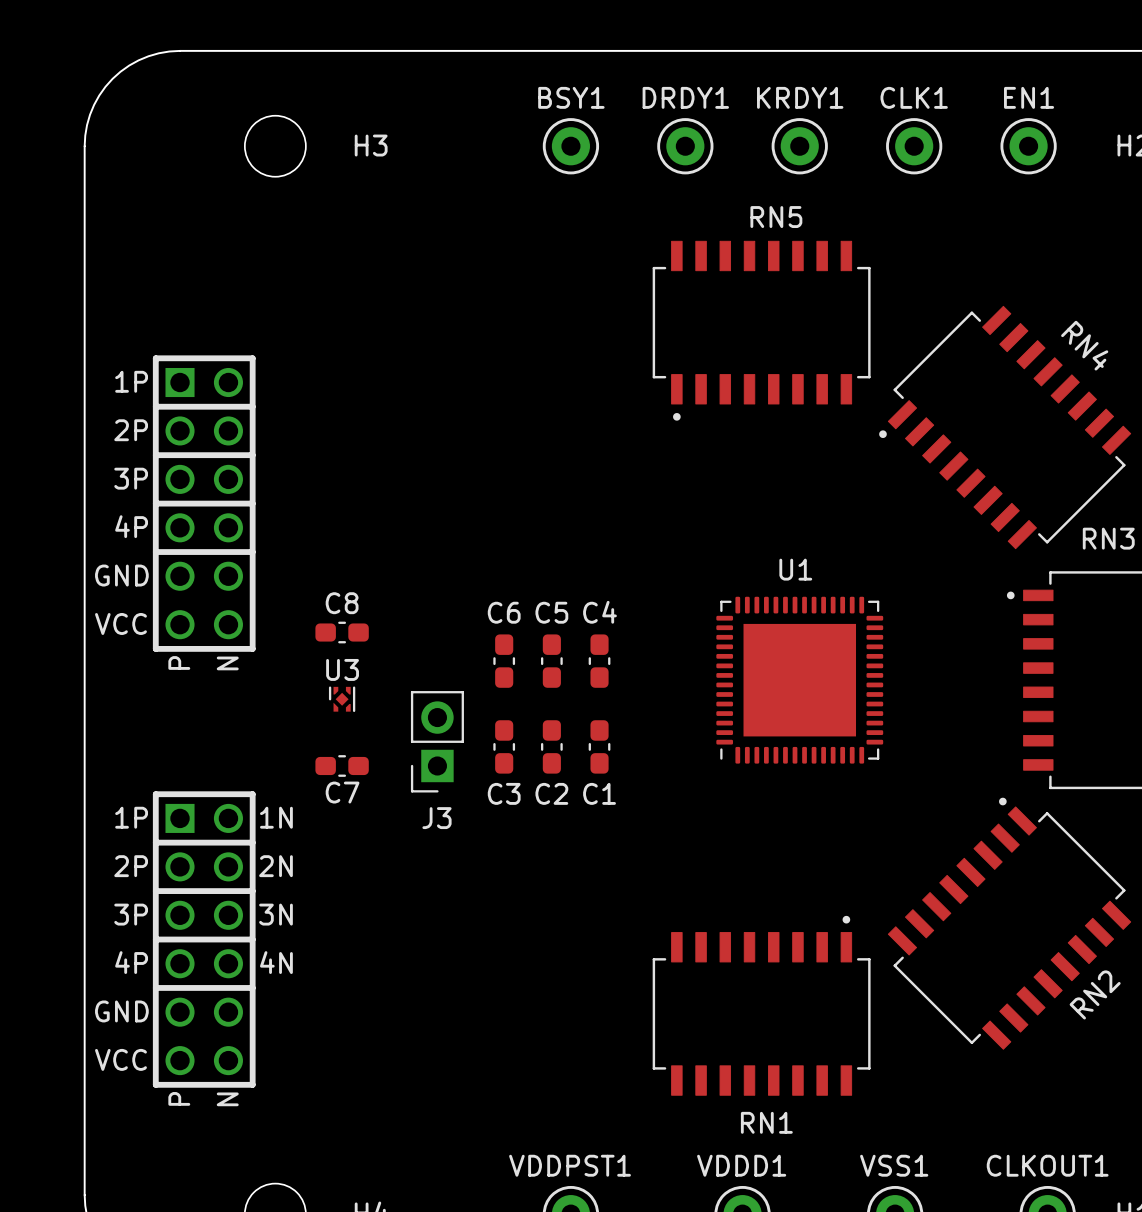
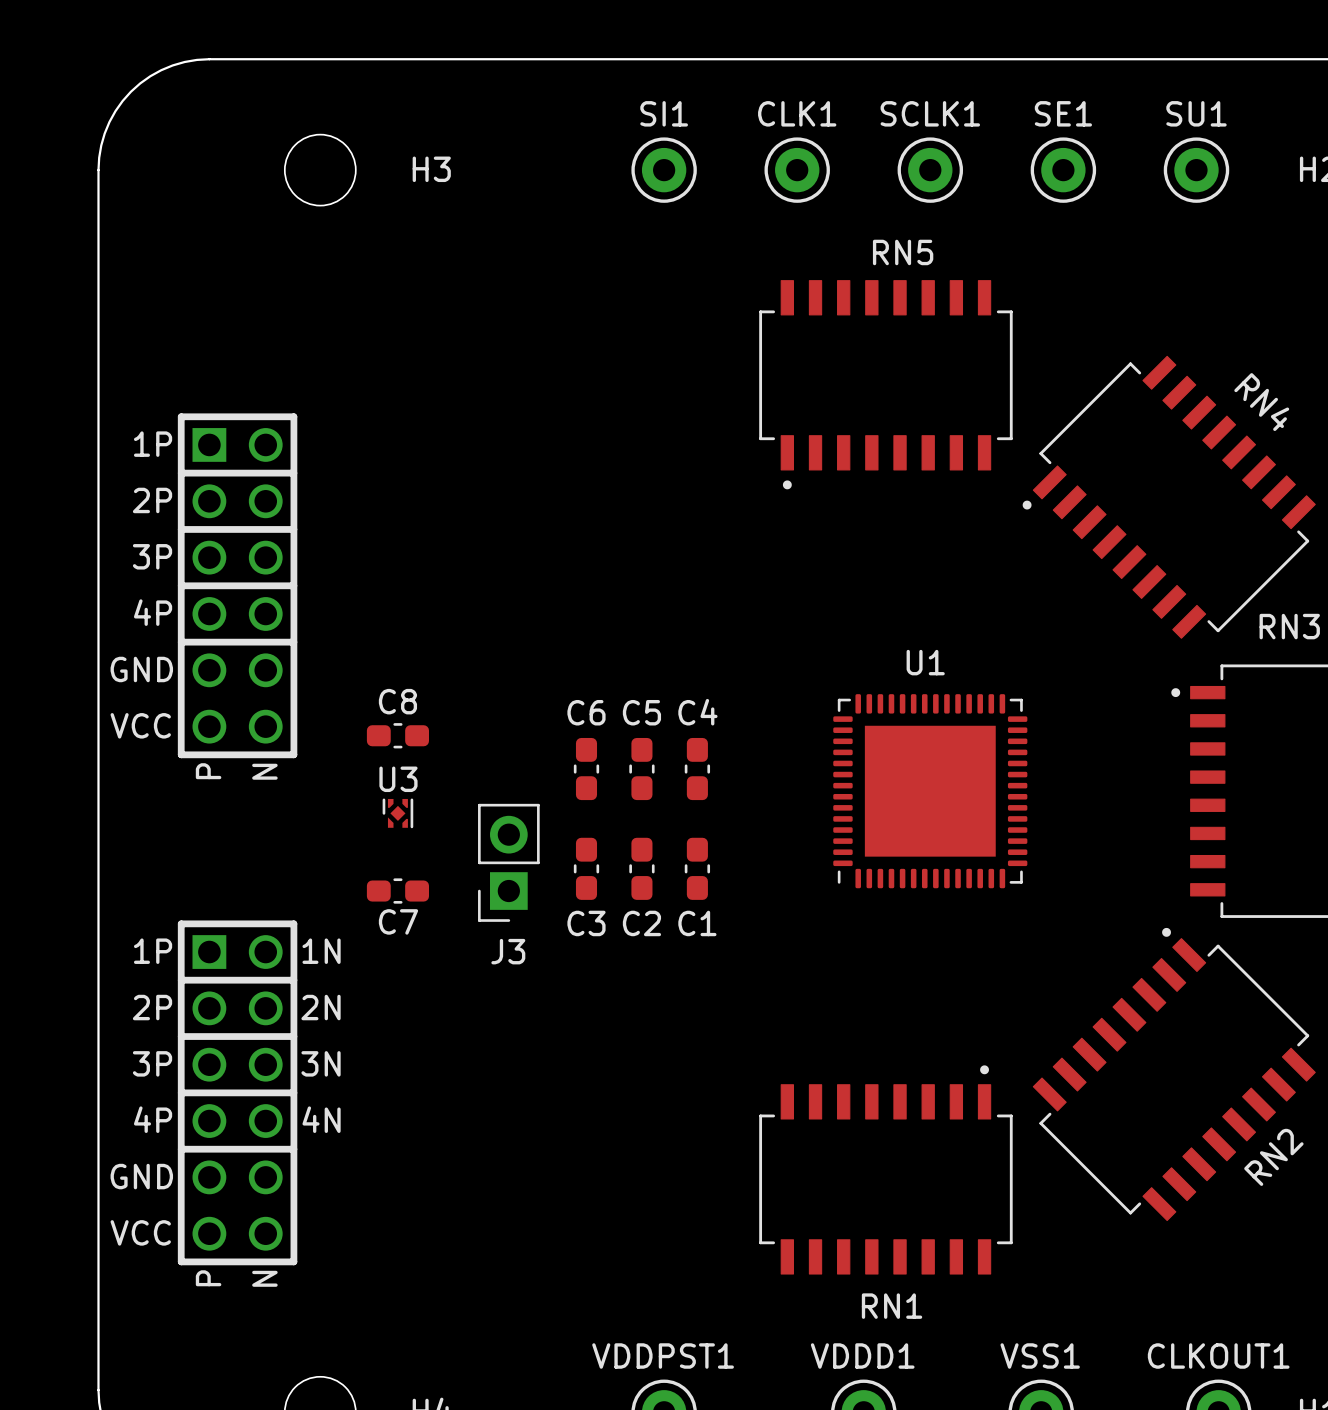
BSY1 name: BSY1 (571, 97) -> SI1 (664, 113)
DRDY1 name: DRDY1 (685, 97) -> CLK1 (797, 113)
KRDY1 name: KRDY1 (800, 97) -> SCLK1 (930, 113)
CLK1 name: CLK1 (914, 97) -> SE1 (1063, 113)
EN1 name: EN1 (1029, 97) -> SU1 (1196, 113)

